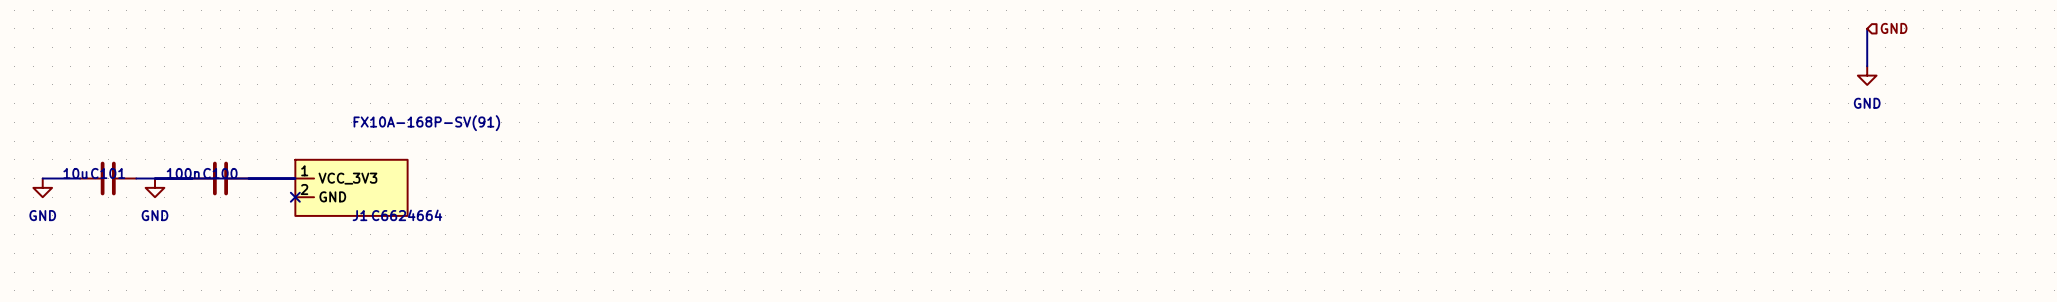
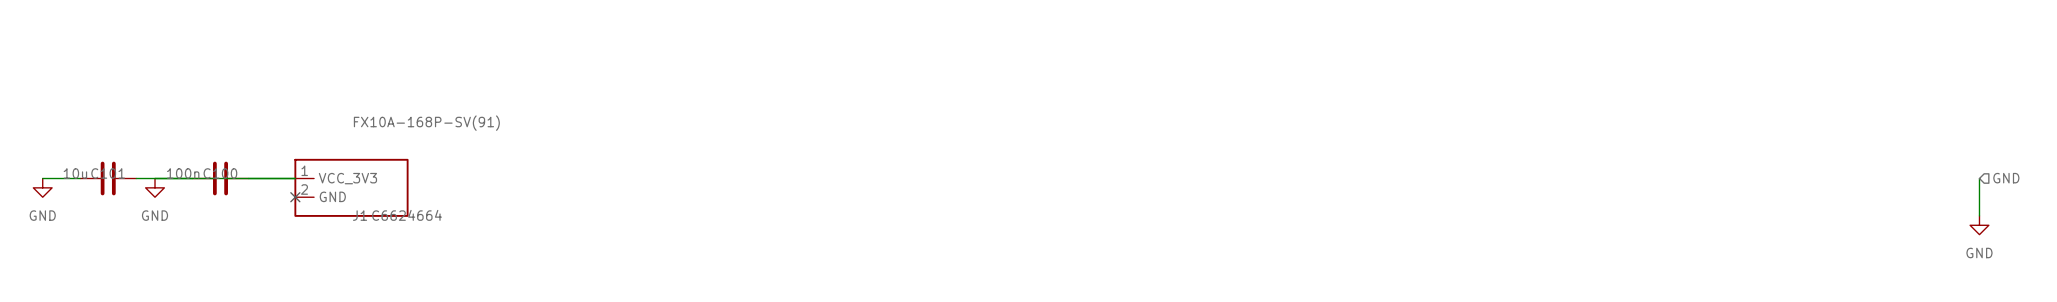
wire: (1867, 28) (1867, 66) -> none
hierarchical label: GND (1894, 28) -> none
power symbol: GND (1867, 75) -> none
wire: none -> (1979, 178) (1979, 215)
hierarchical label: none -> GND (2006, 178)
power symbol: none -> GND (1979, 225)

